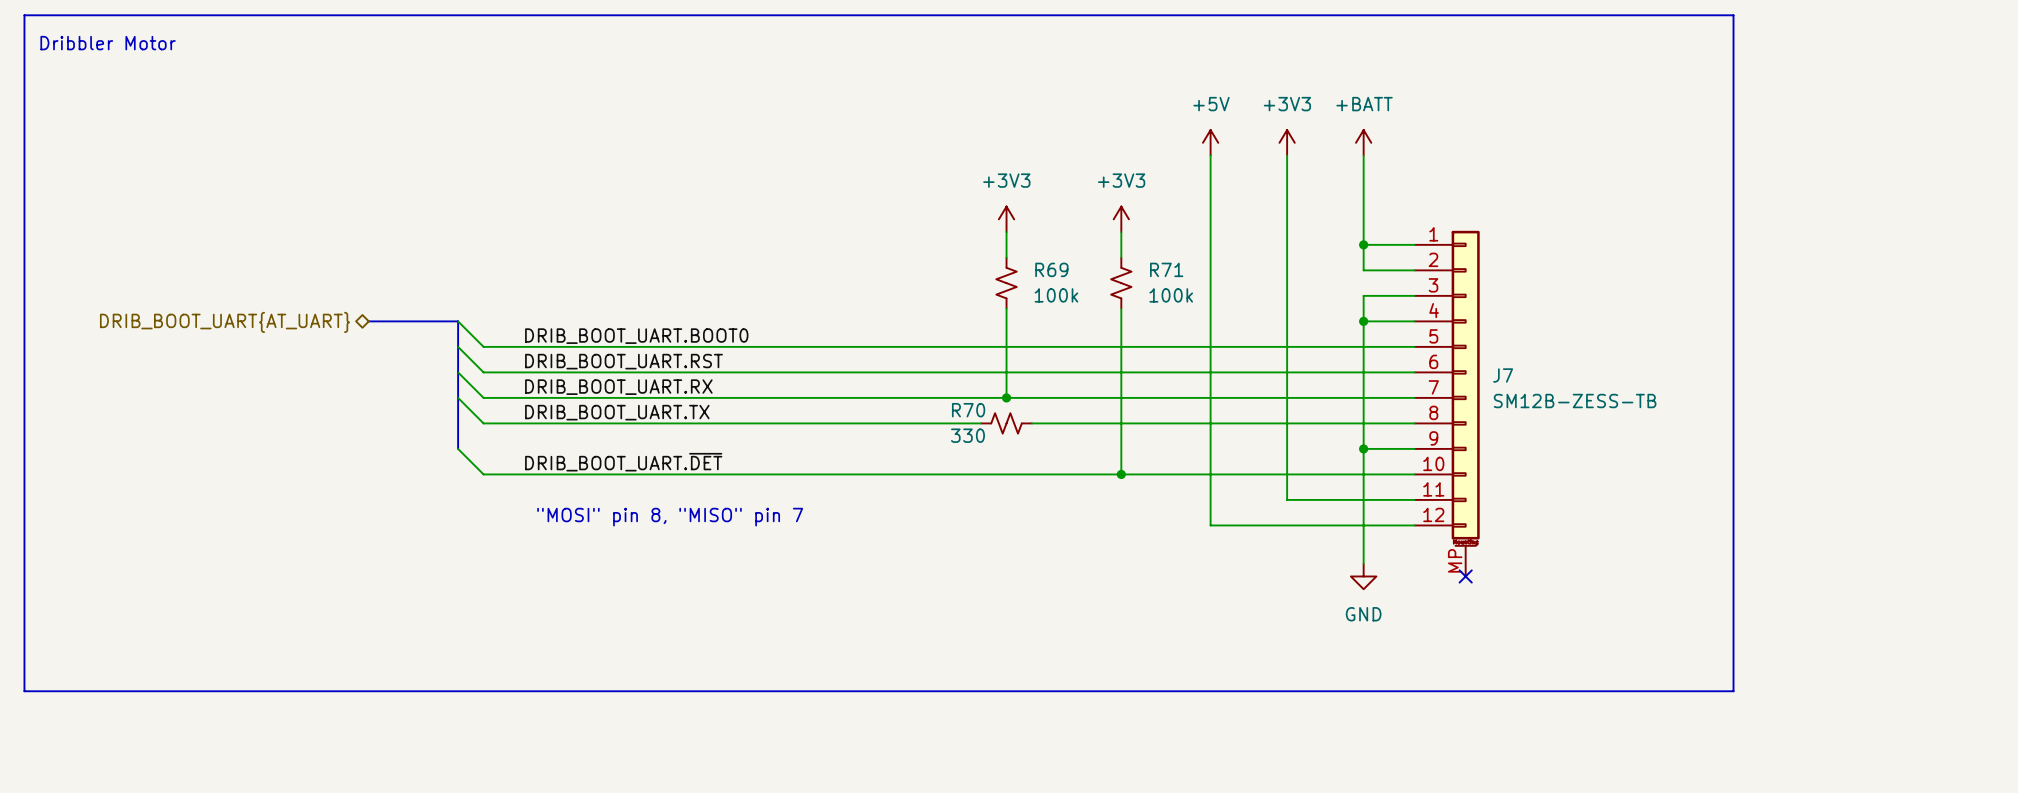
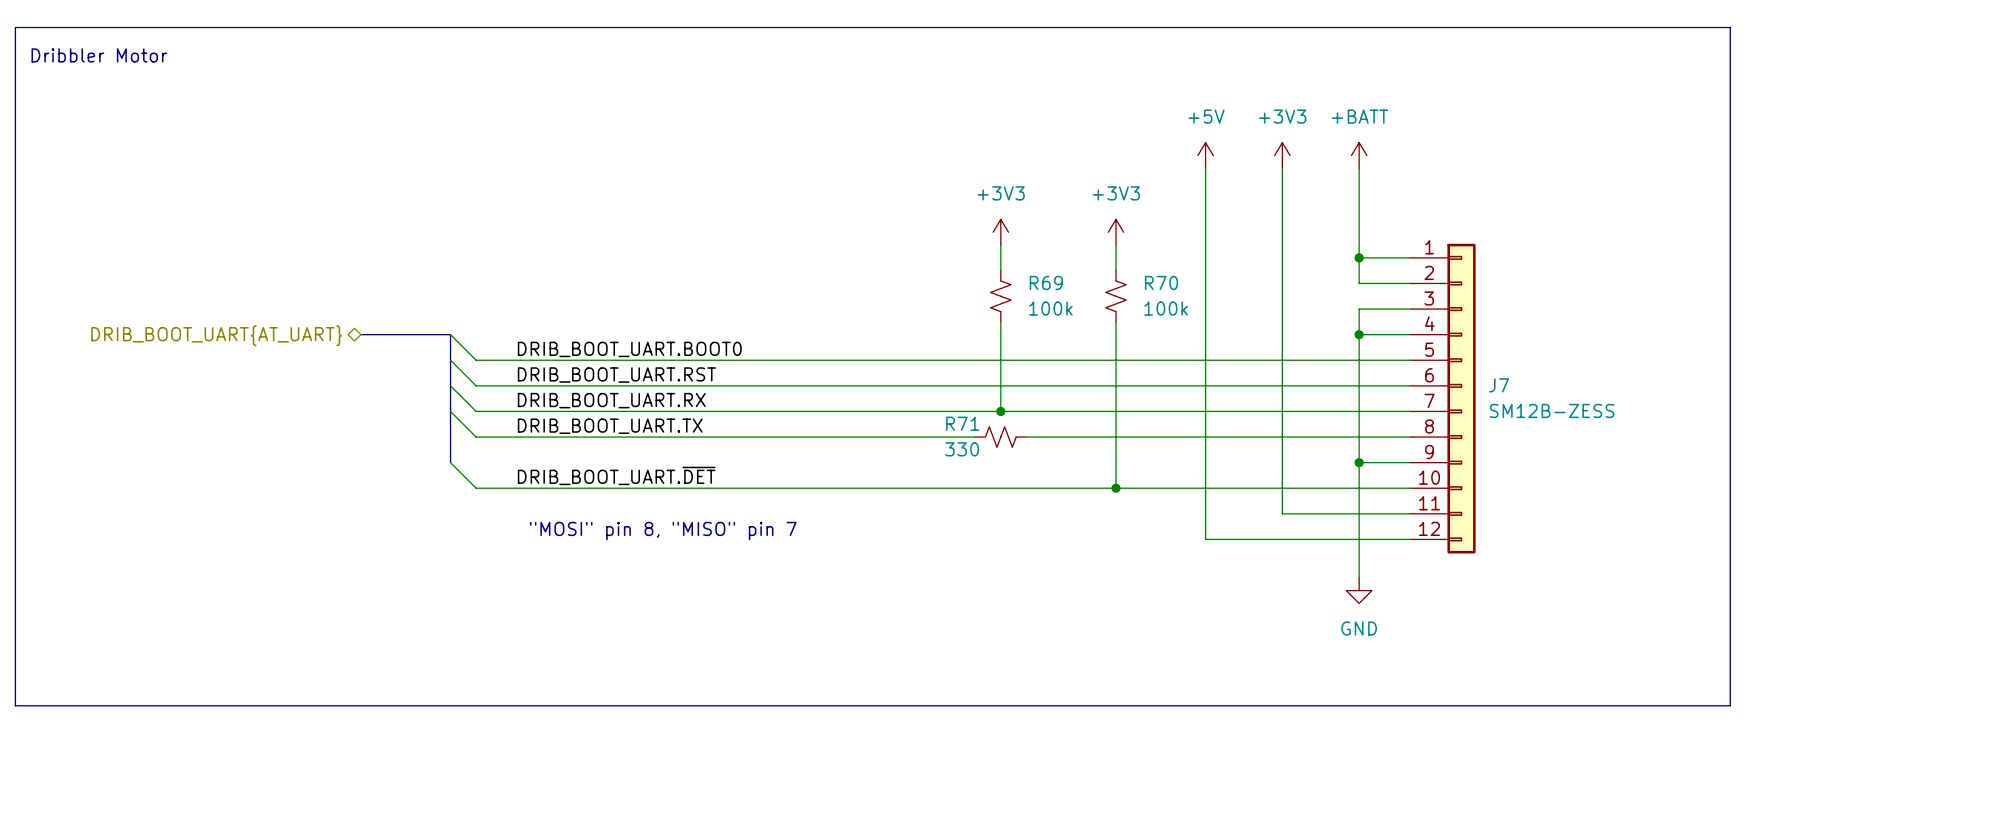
J7 symbol: [1414, 230, 1480, 577] -> [1410, 243, 1476, 554]
R71 name: R71 (1166, 269) -> R70 (1161, 282)
J7 value: SM12B-ZESS-TB (1575, 401) -> SM12B-ZESS (1552, 410)
R70 name: R70 (968, 410) -> R71 (962, 423)
no-connect mark: (1465, 576) -> none

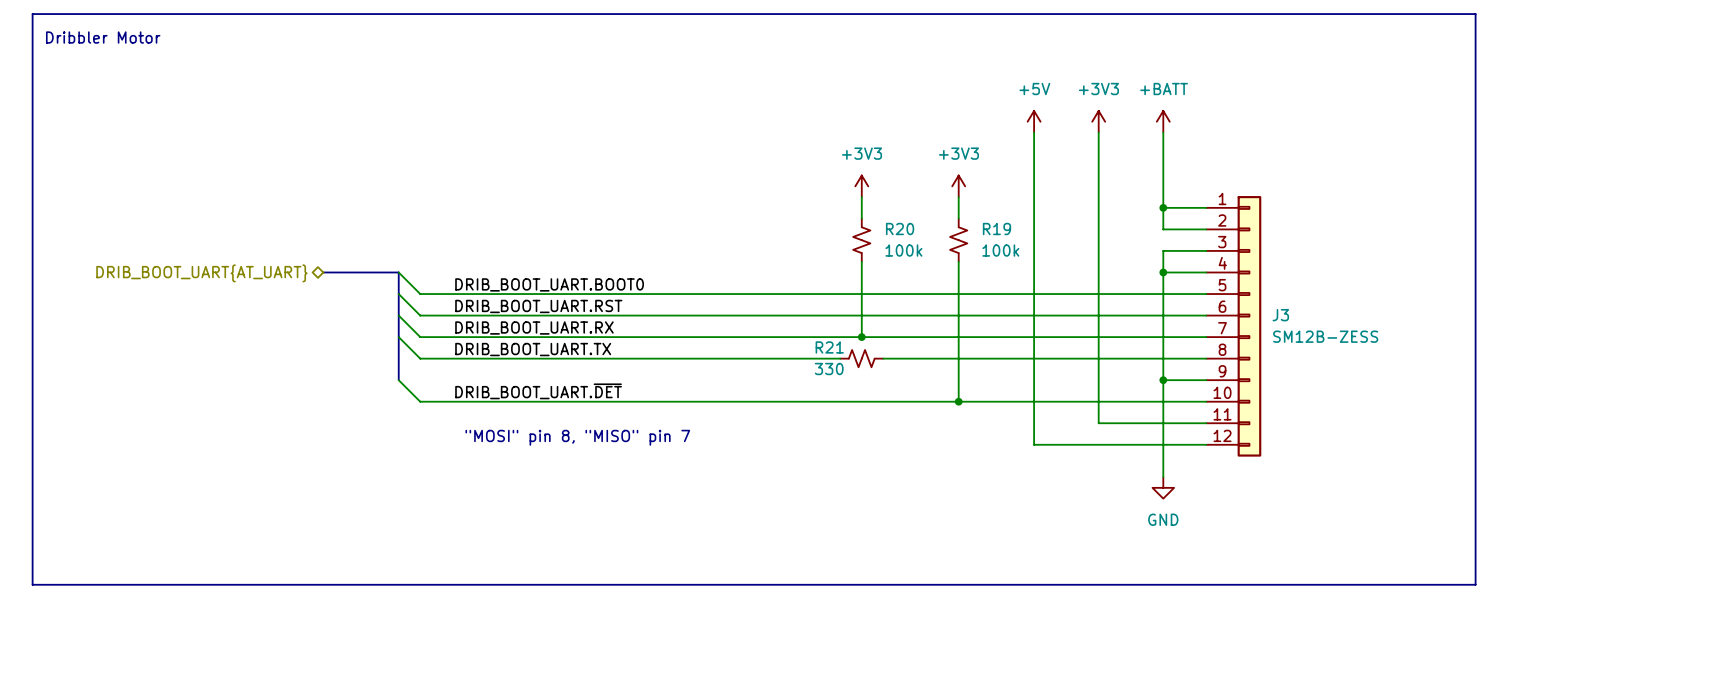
R69 name: R69 (1046, 282) -> R20 (900, 229)
R70 name: R70 (1161, 282) -> R19 (996, 229)
J7 name: J7 (1499, 385) -> J3 (1280, 315)
R71 name: R71 (962, 423) -> R21 (829, 347)

